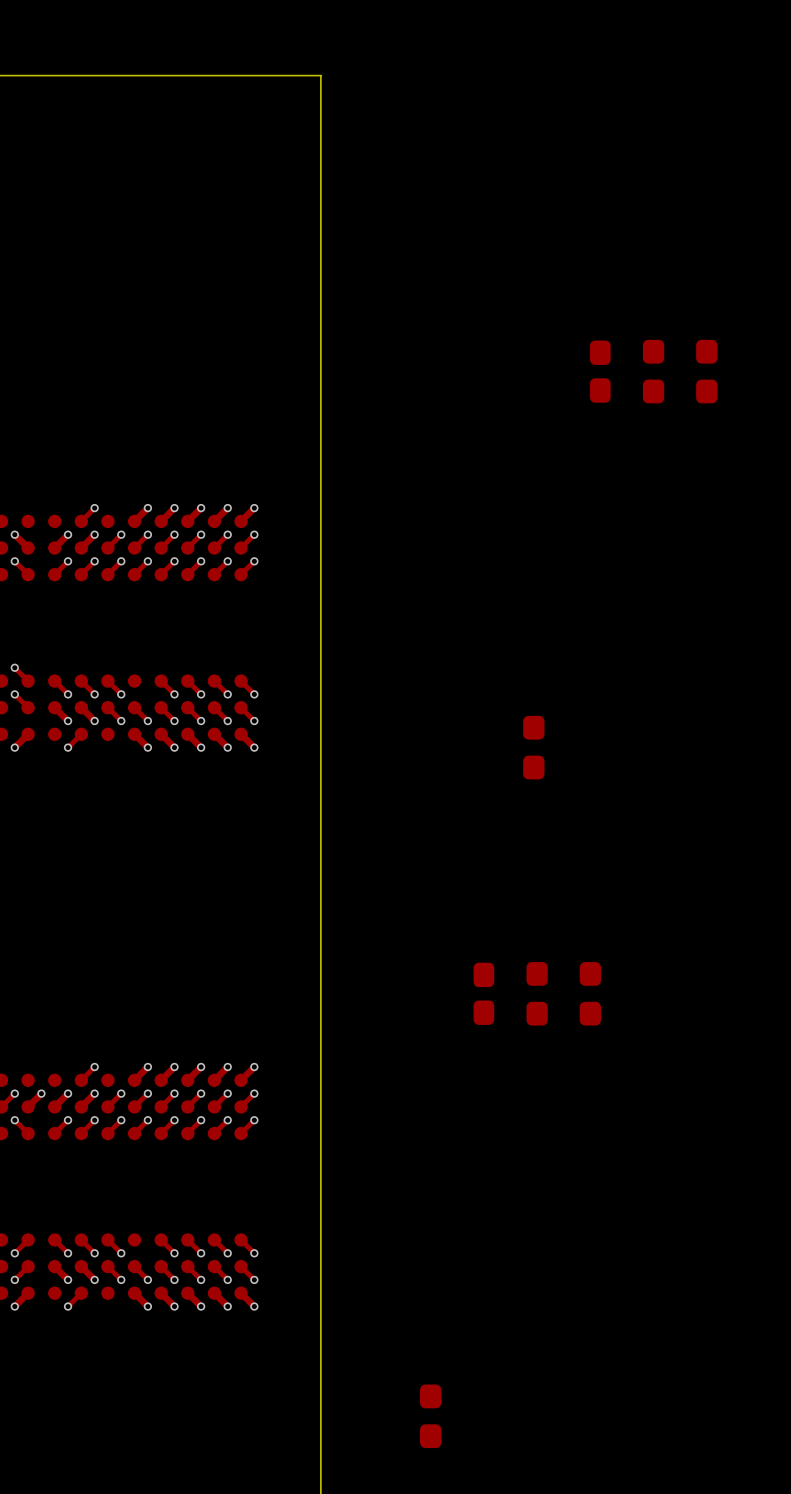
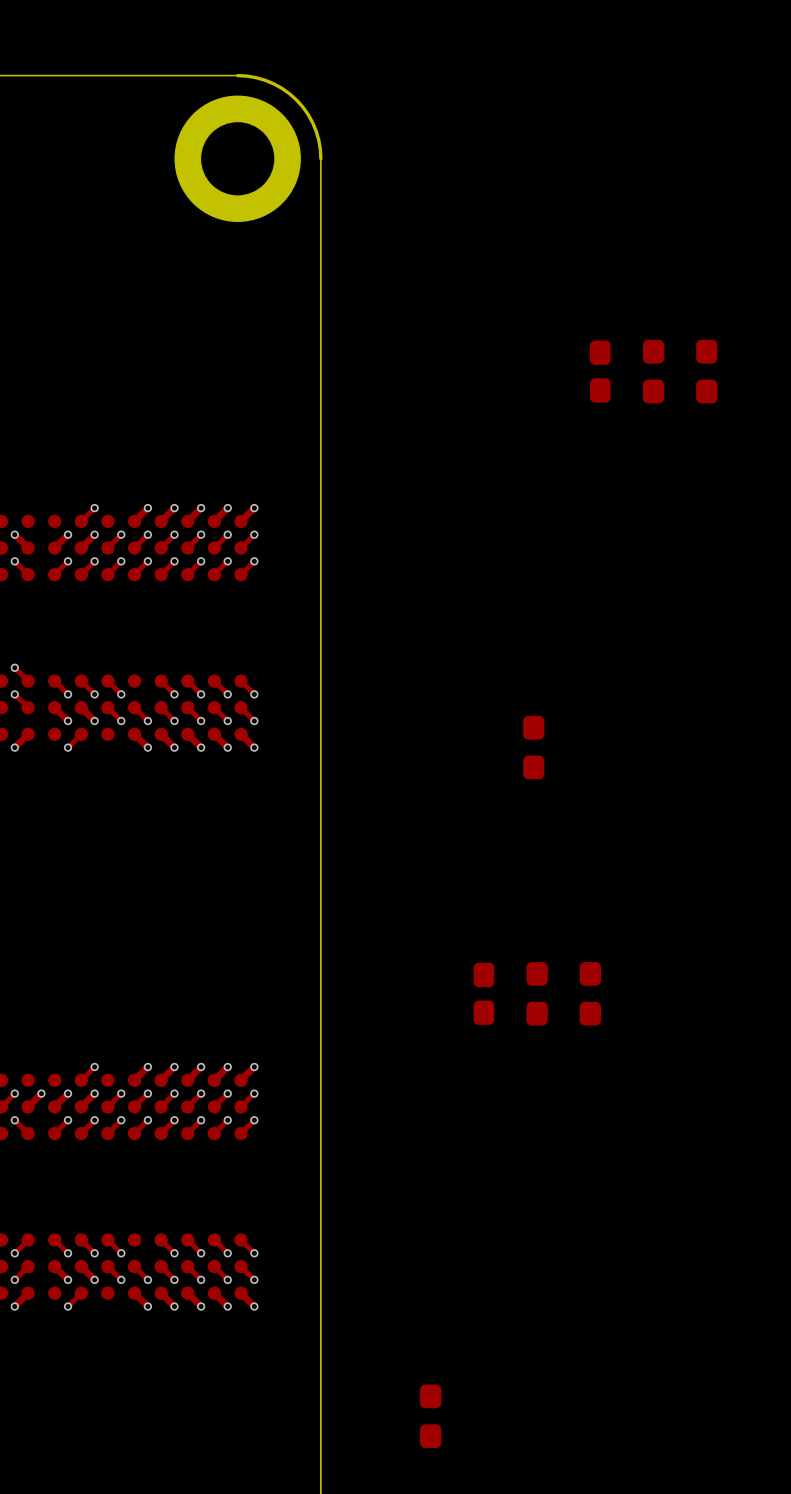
board edge: (237, 75) (320, 75) (320, 158) -> (237, 75) (256, 77) (273, 83) (296, 99) (308, 114) (316, 131) (320, 158)
part: none -> (237, 158)

